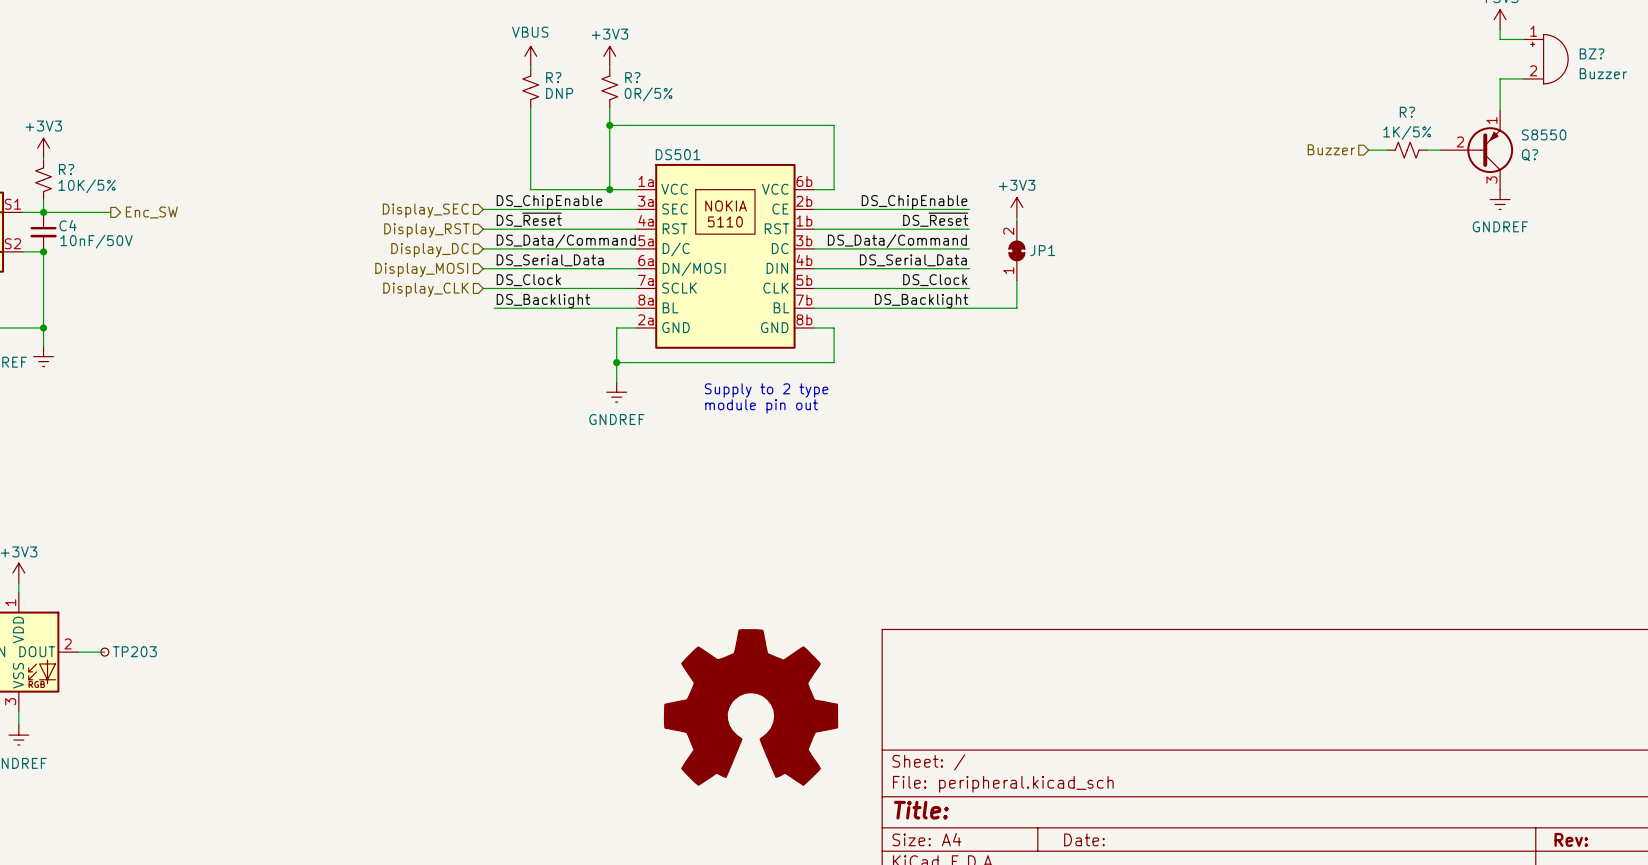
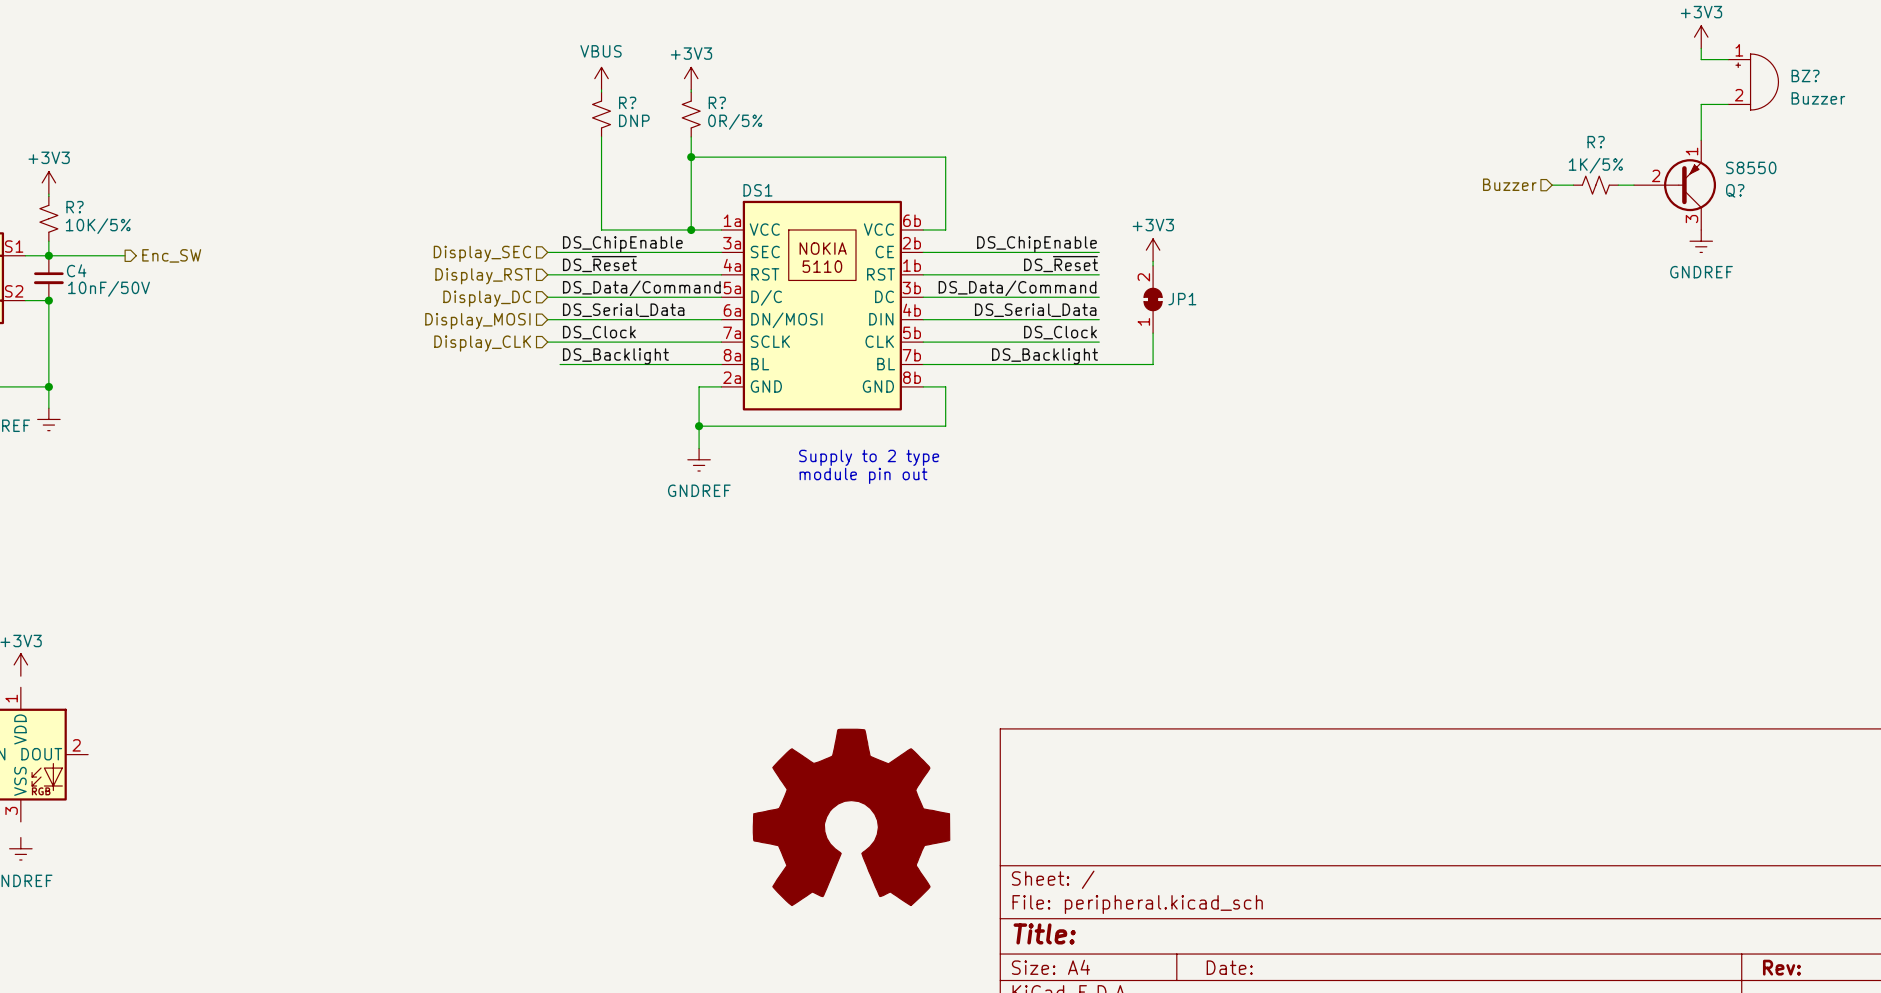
DS501 name: DS501 (678, 154) -> DS1 (757, 190)
wire: (18, 582) (18, 592) -> none
wire: (78, 652) (104, 652) -> none
TP203: (104, 652) -> none
wire: (18, 711) (18, 725) -> none

